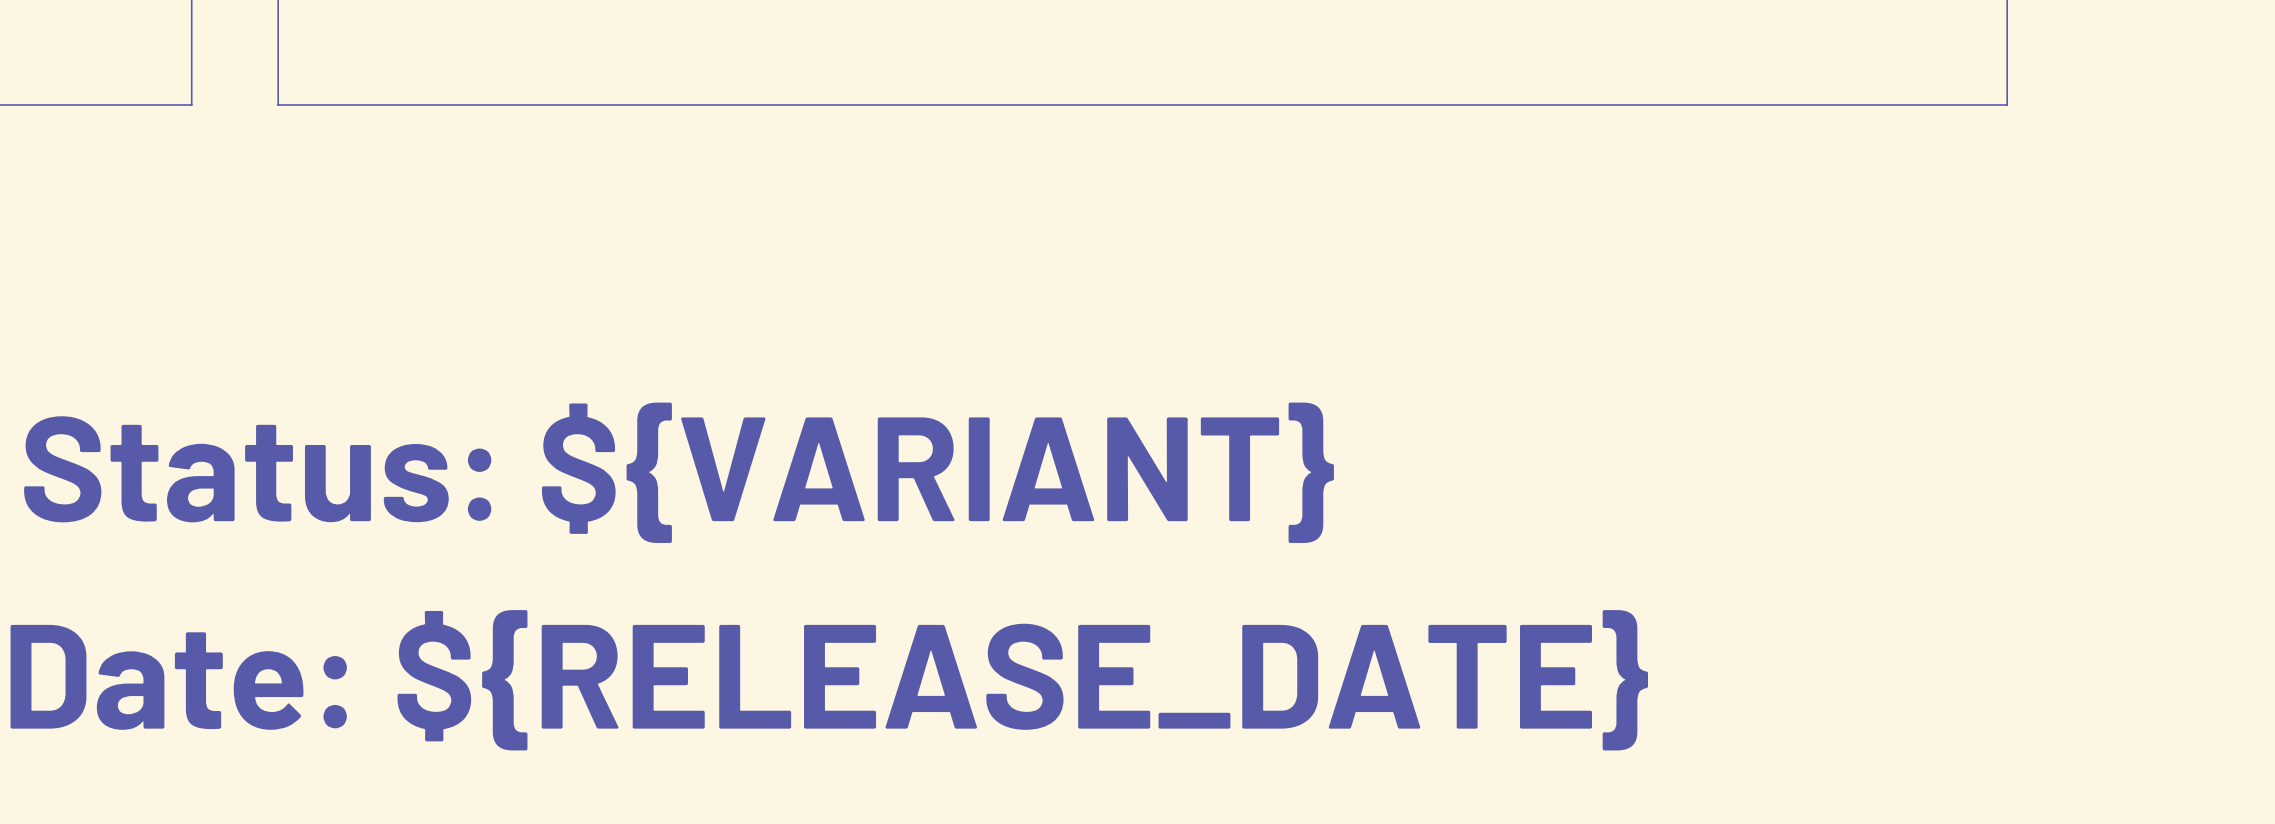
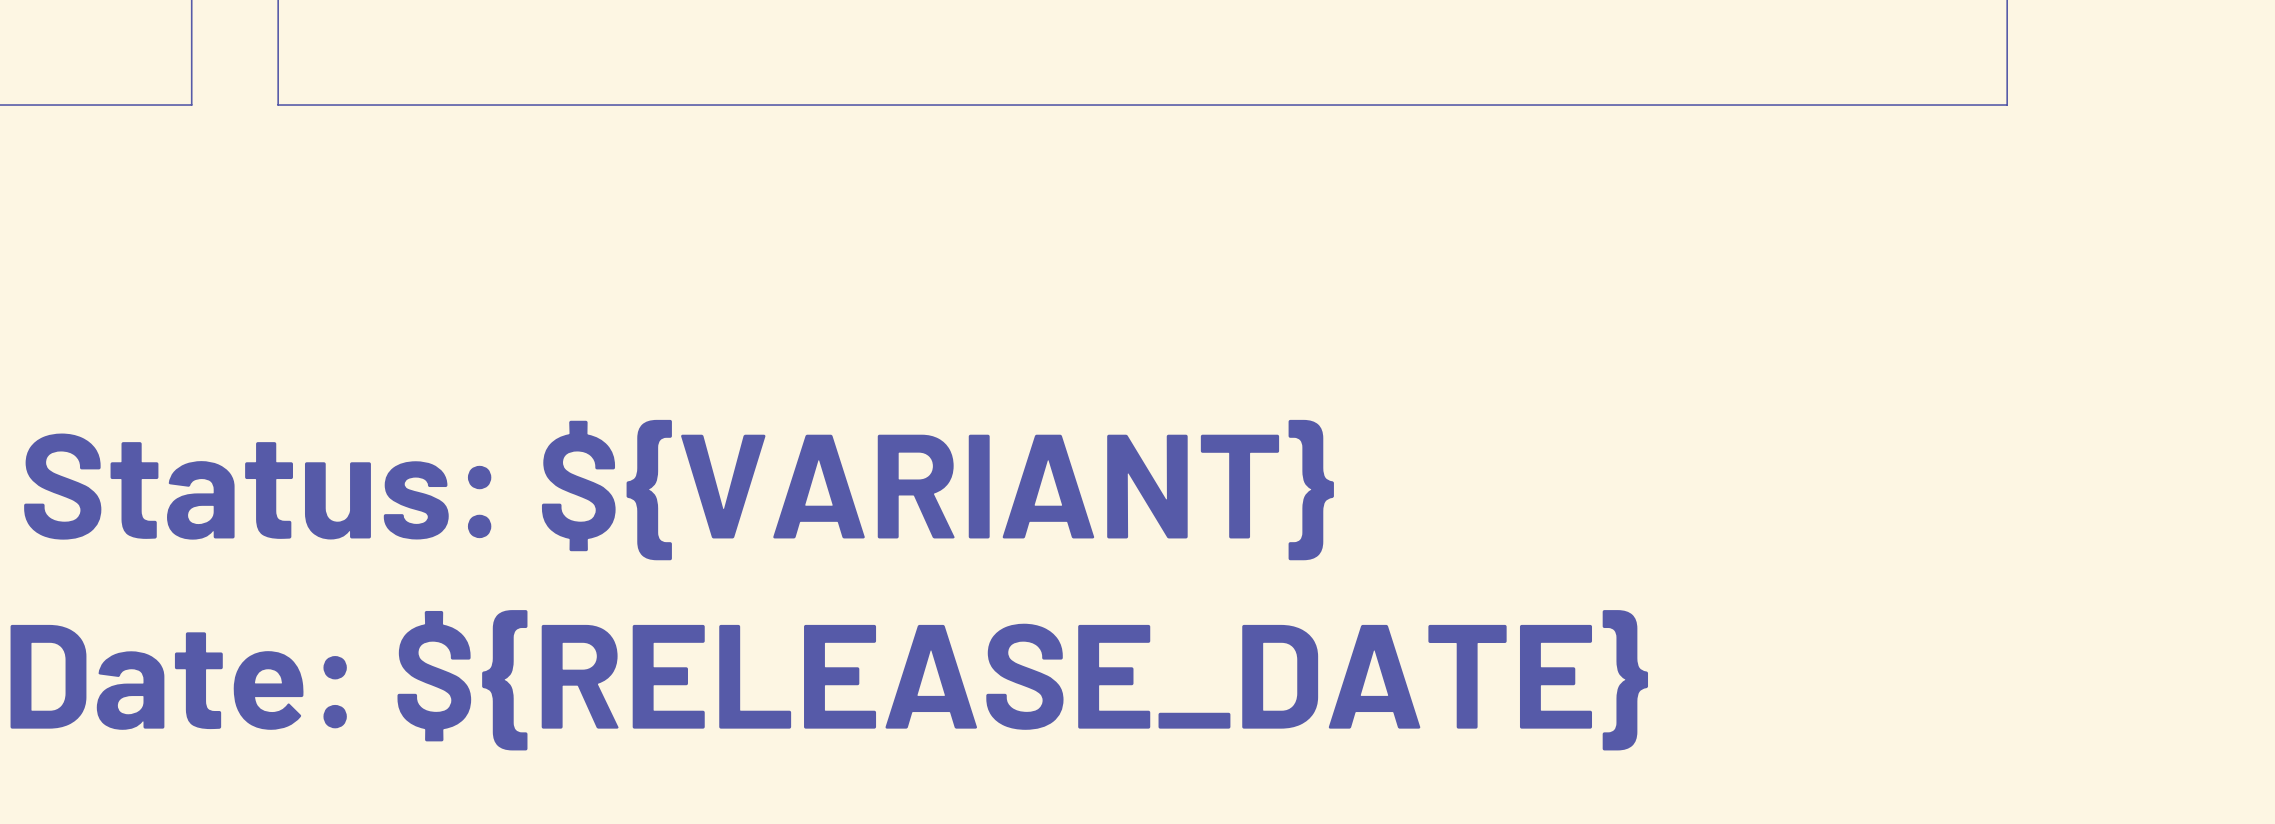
text position: Status: ${VARIANT} (679, 472) -> Status: ${VARIANT} (679, 490)

